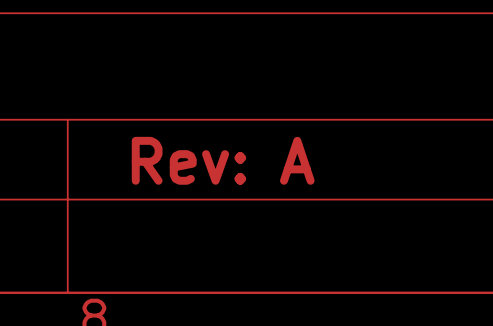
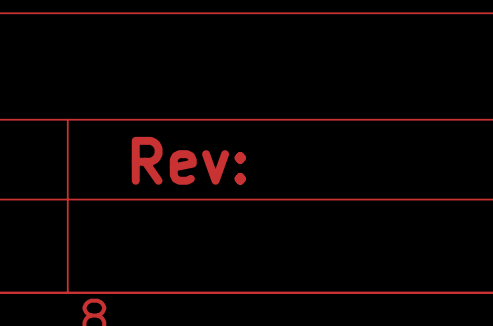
title block: Rev: A (223, 160) -> Rev: (188, 160)

